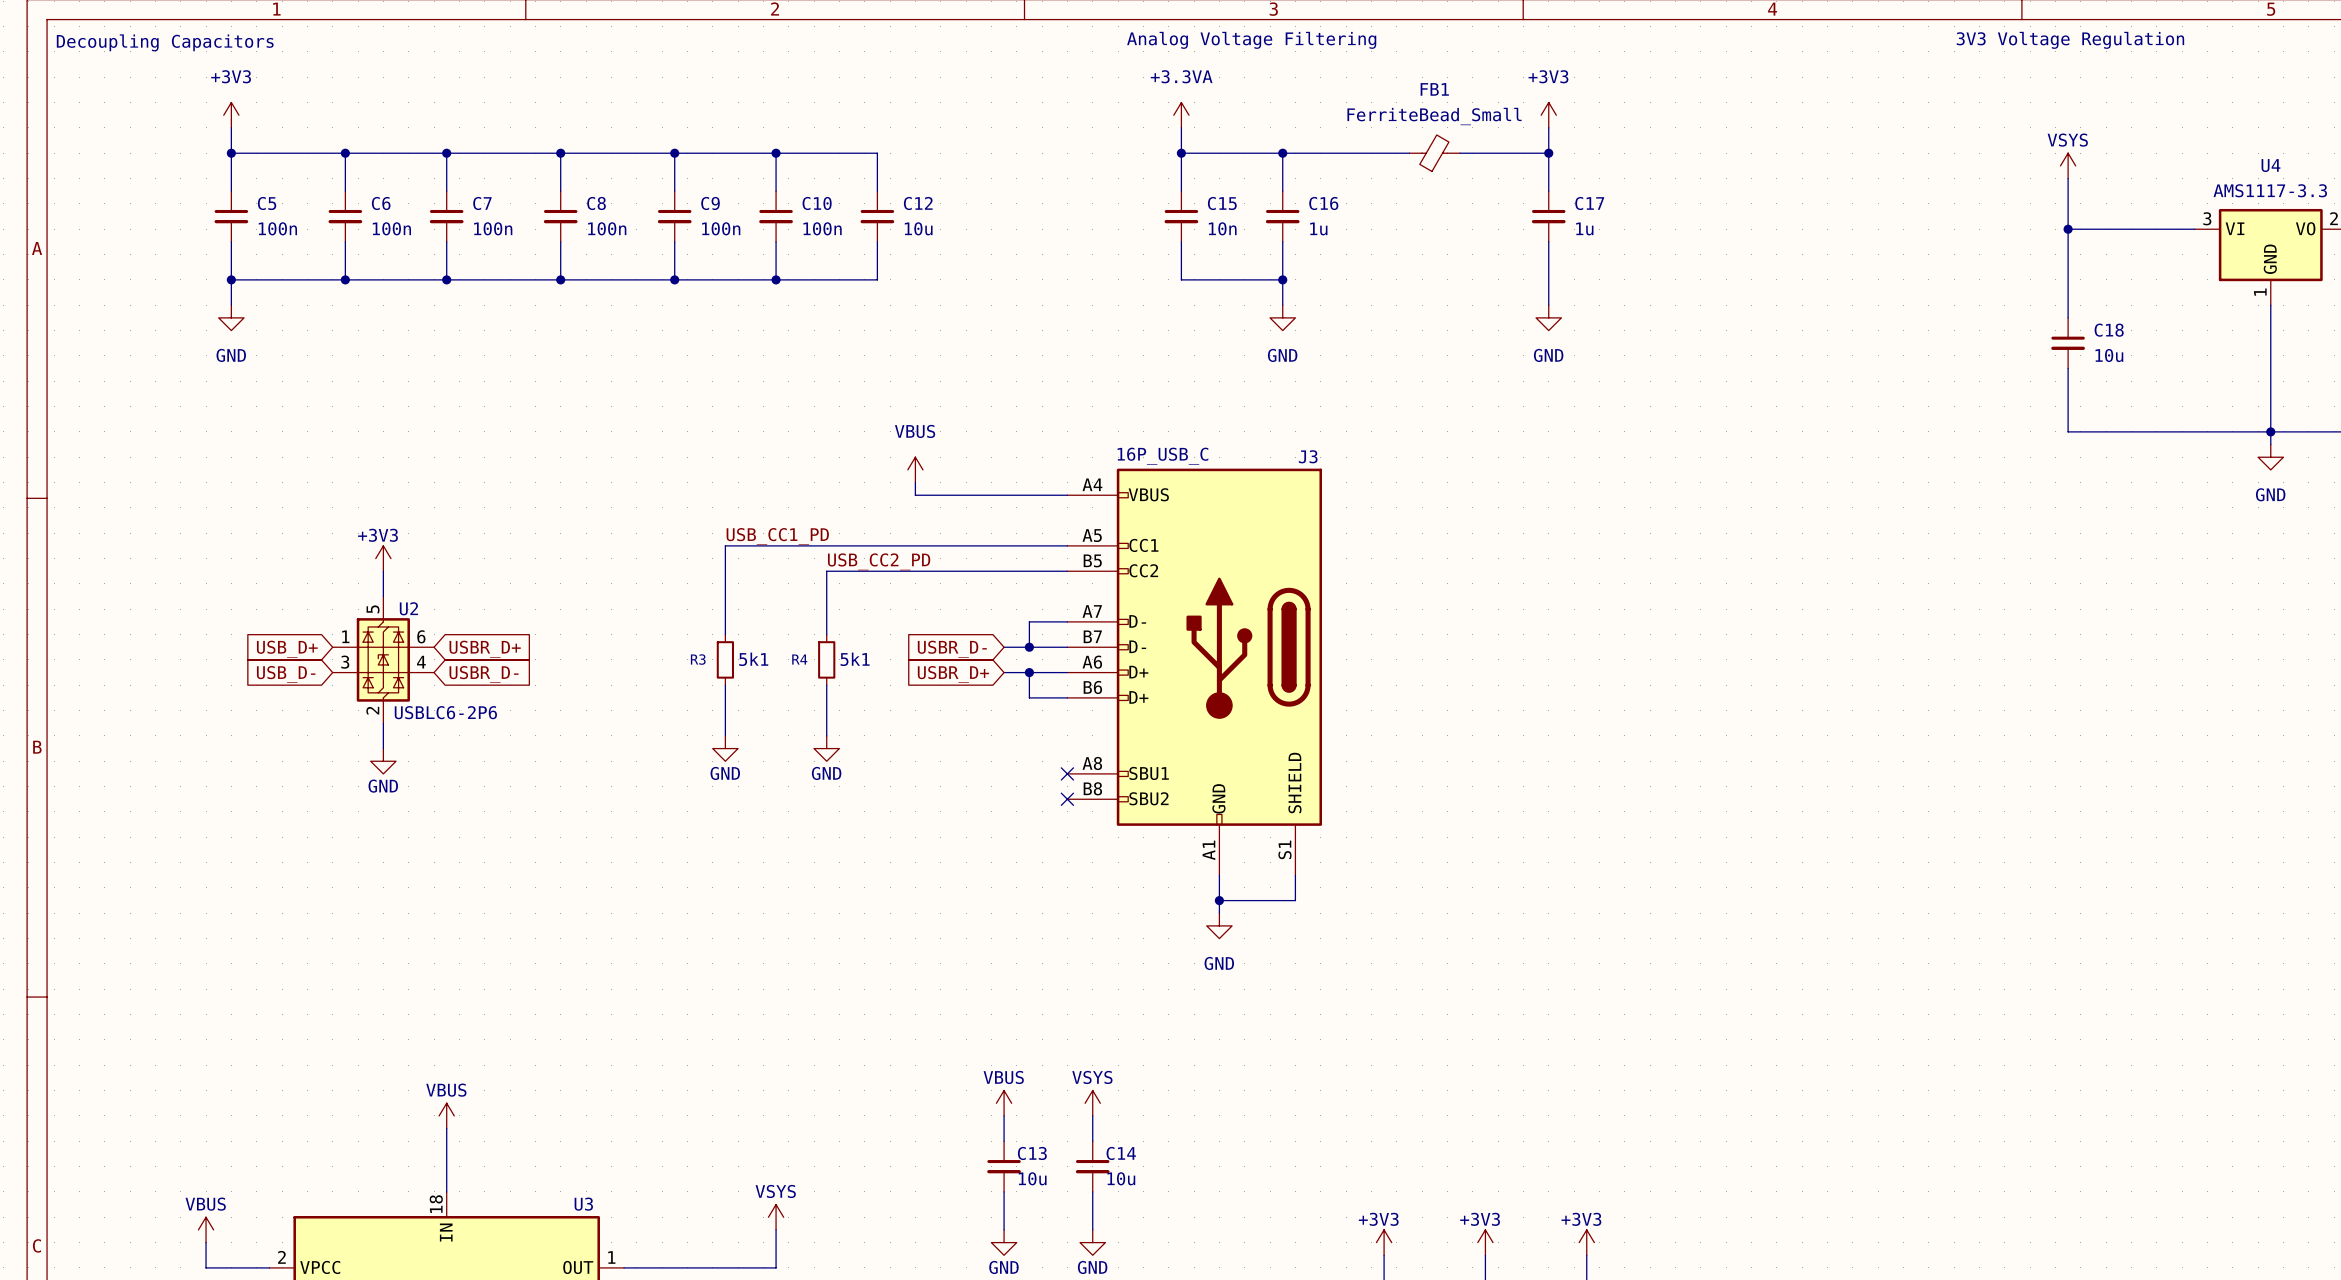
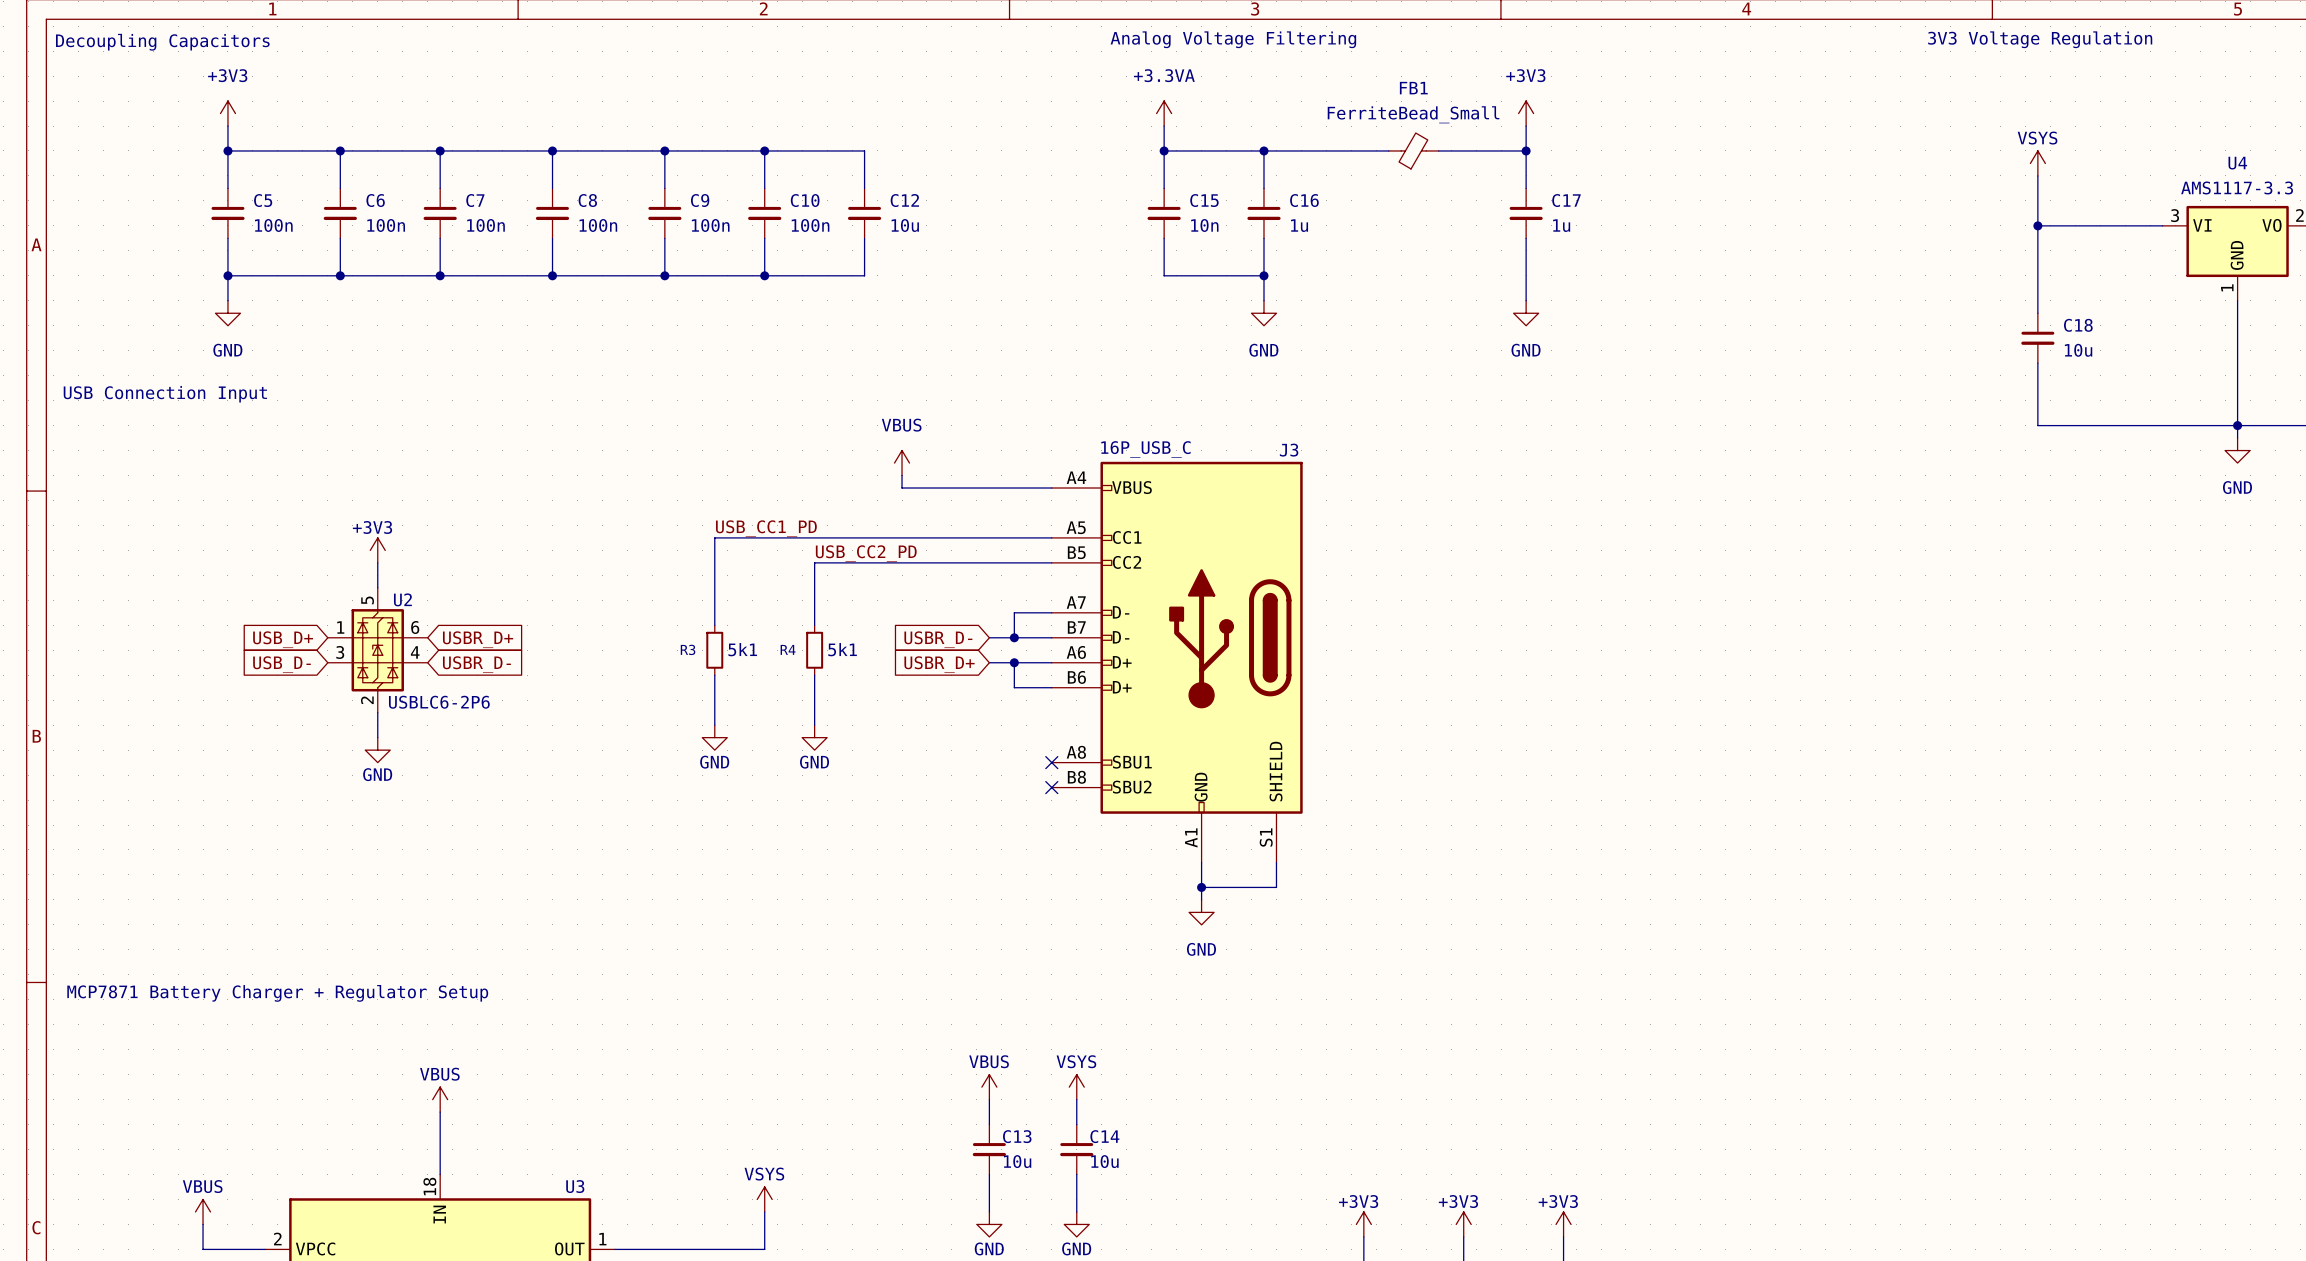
text: none -> USB Connection Input (165, 394)
text: none -> MCP7871 Battery Charger + Regulator Setup (277, 993)

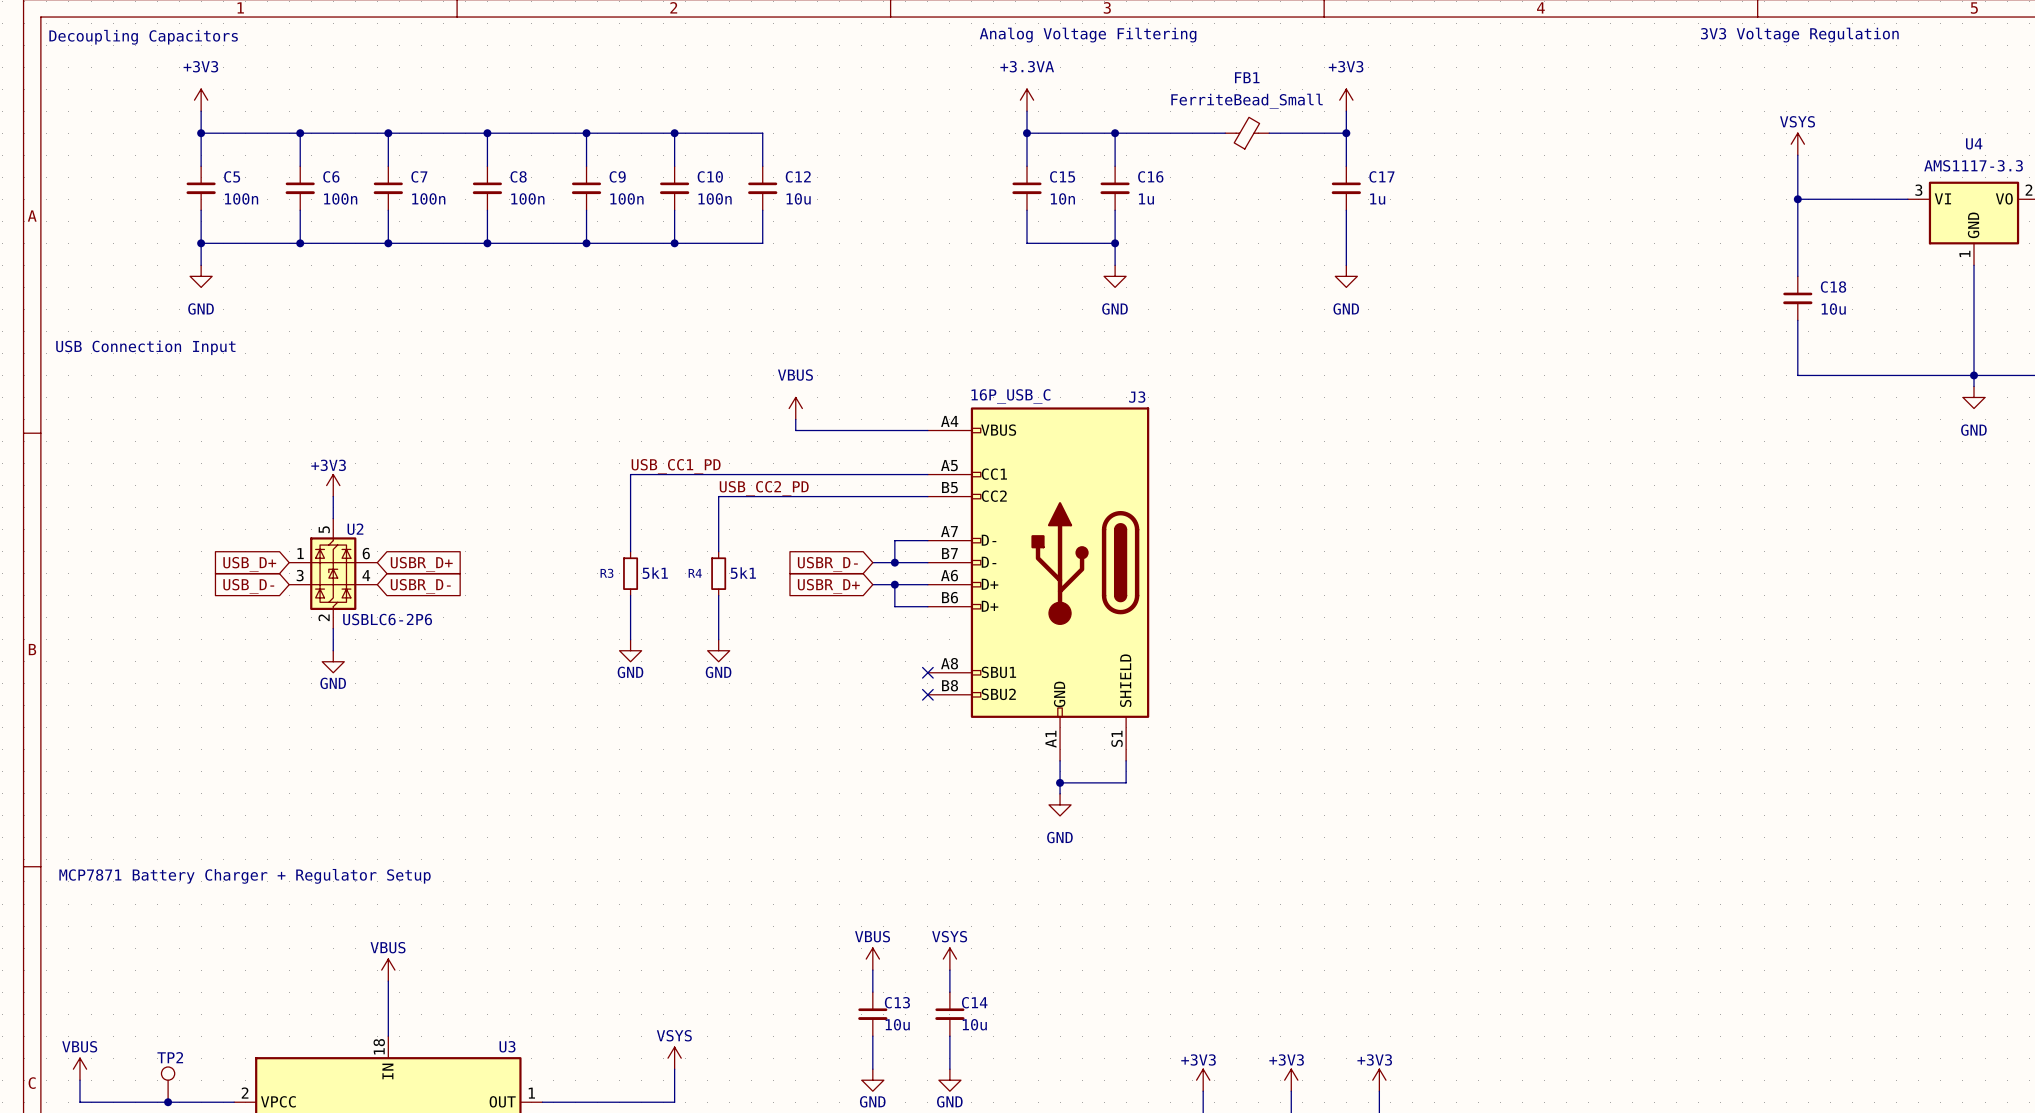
power symbol position: VBUS (203, 1211) -> VBUS (79, 1069)
wire: (203, 1224) (203, 1249) -> (79, 1080) (79, 1102) (179, 1102)
TP2: none -> (168, 1084)
junction: none -> (168, 1102)

